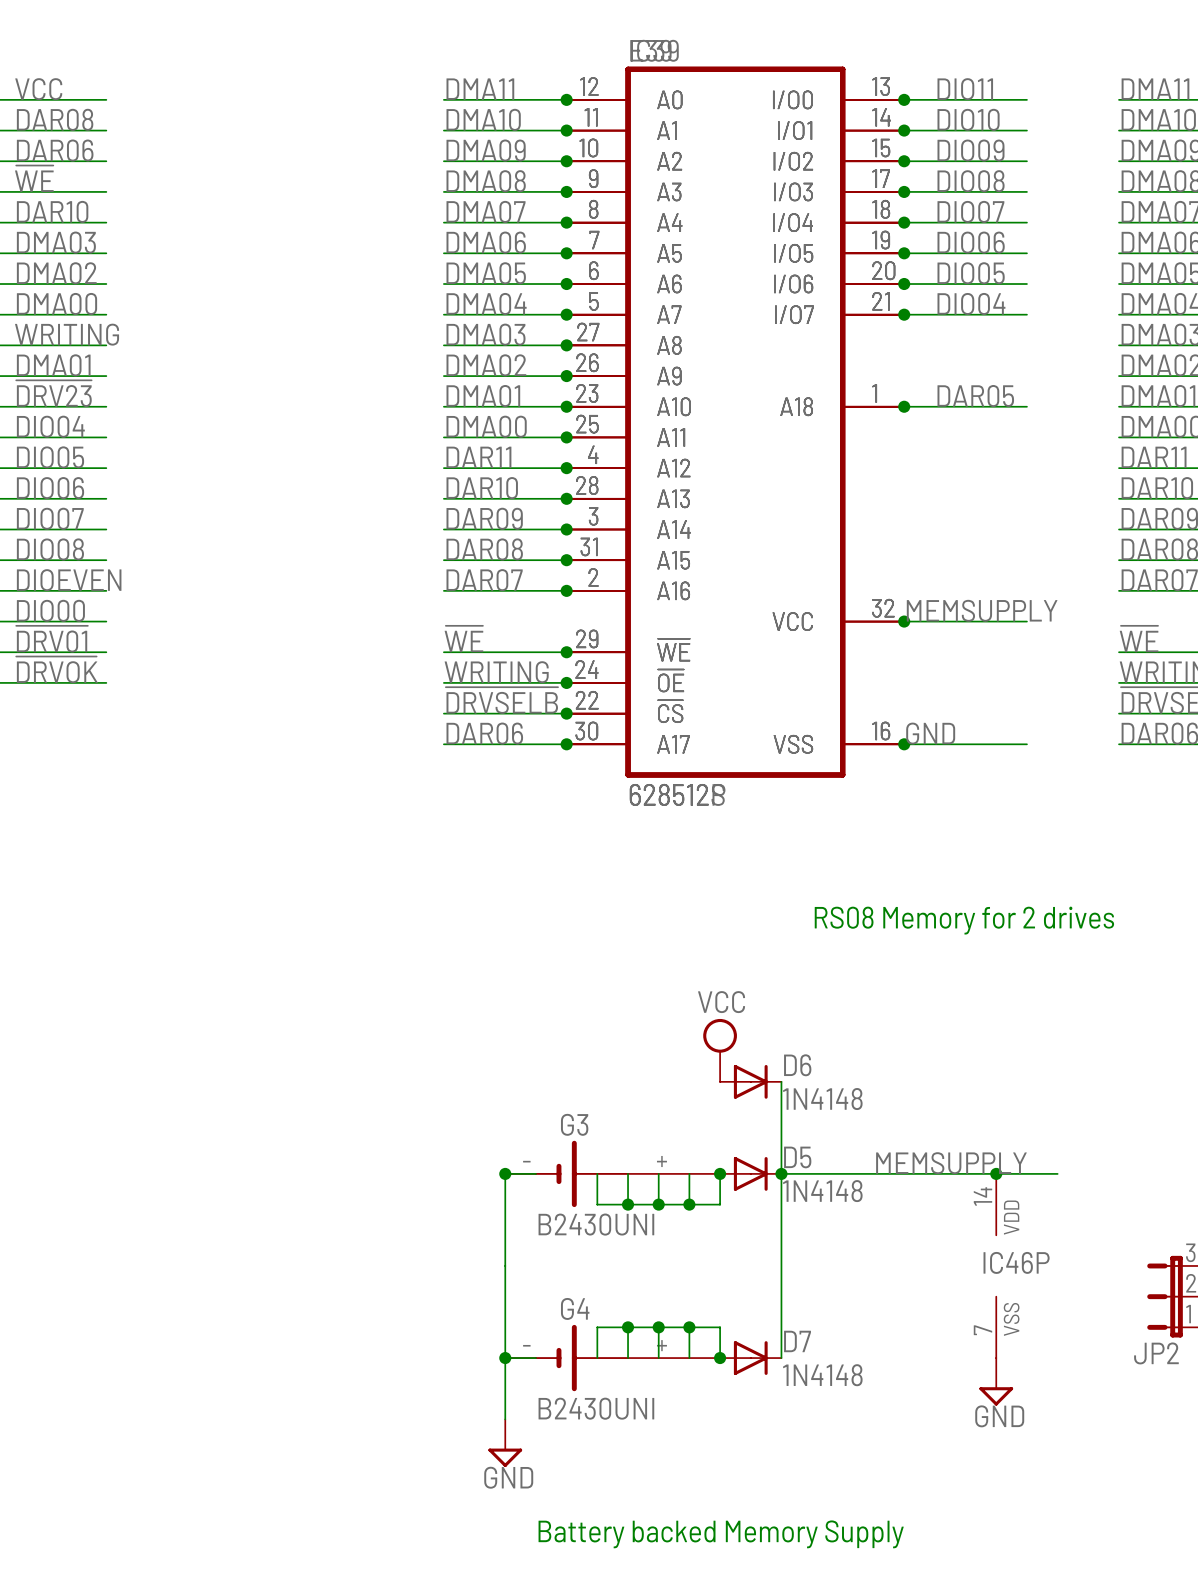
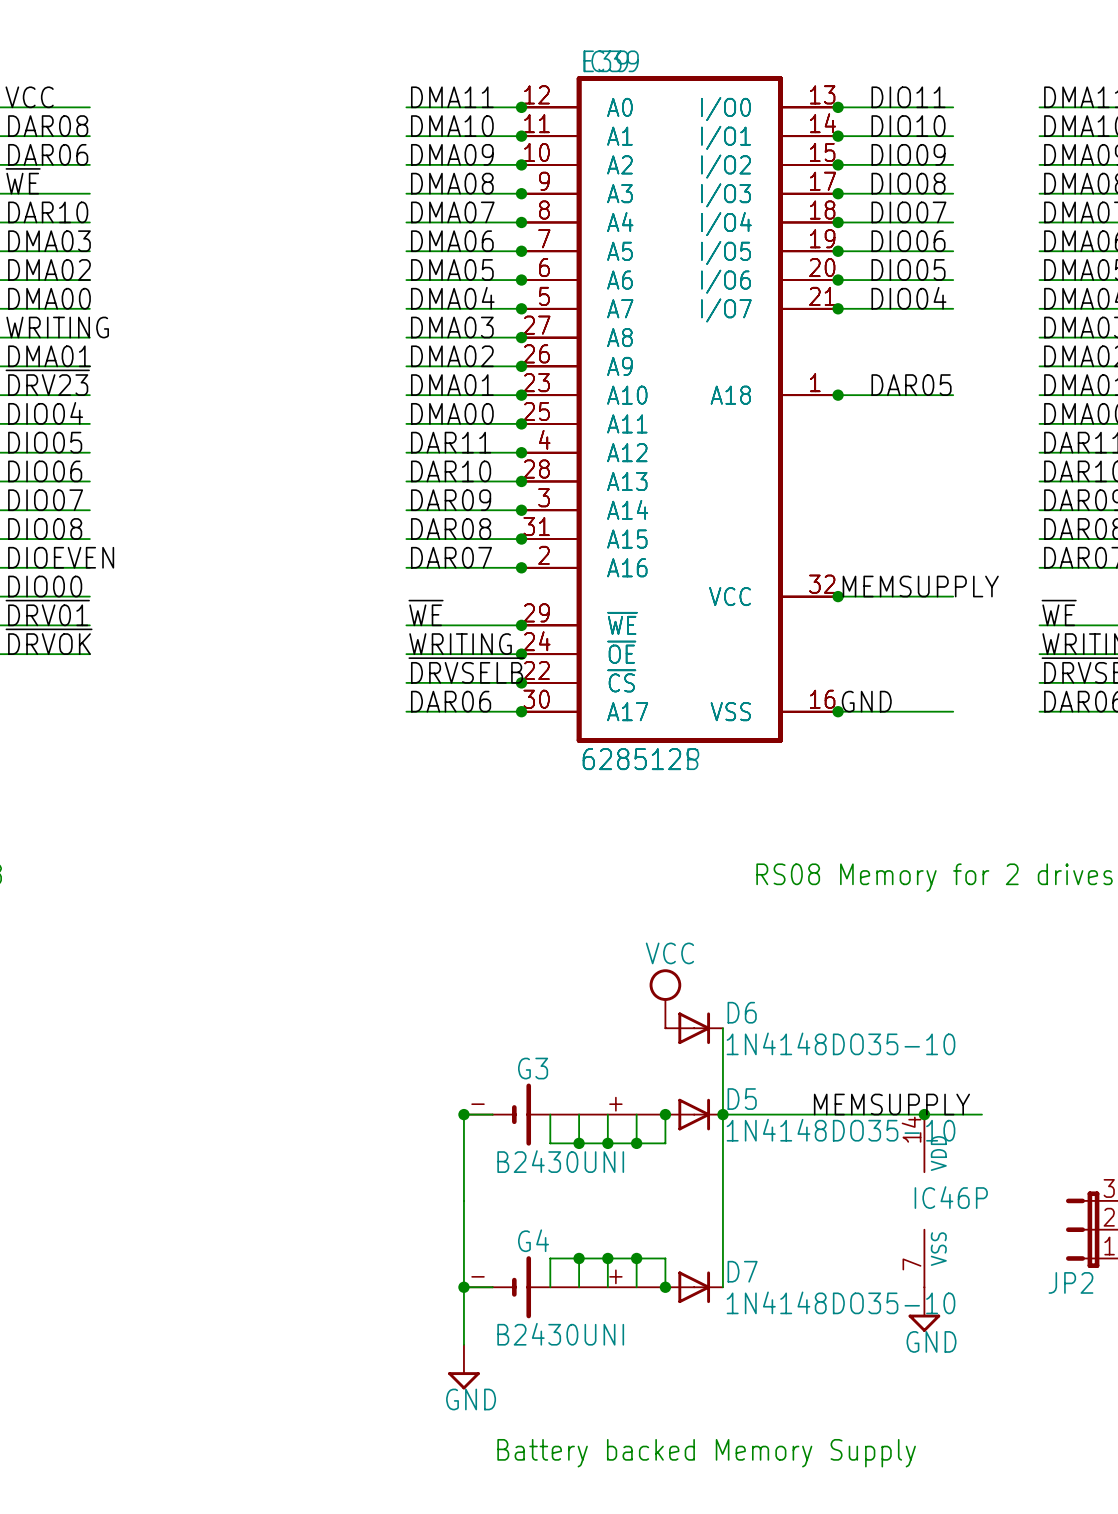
D6 value: 1N4148 (822, 1099) -> 1N4148DO35-10 (841, 1043)
D5 value: 1N4148 (822, 1191) -> 1N4148DO35-10 (841, 1130)
D7 value: 1N4148 (822, 1375) -> 1N4148DO35-10 (841, 1302)

